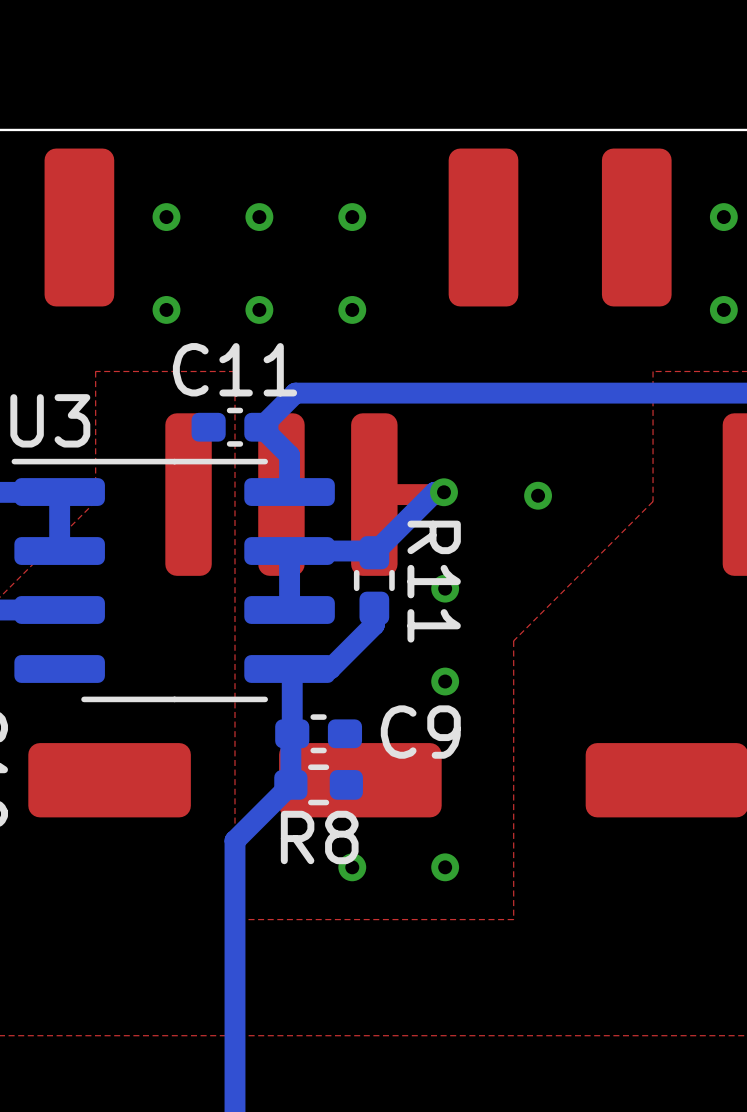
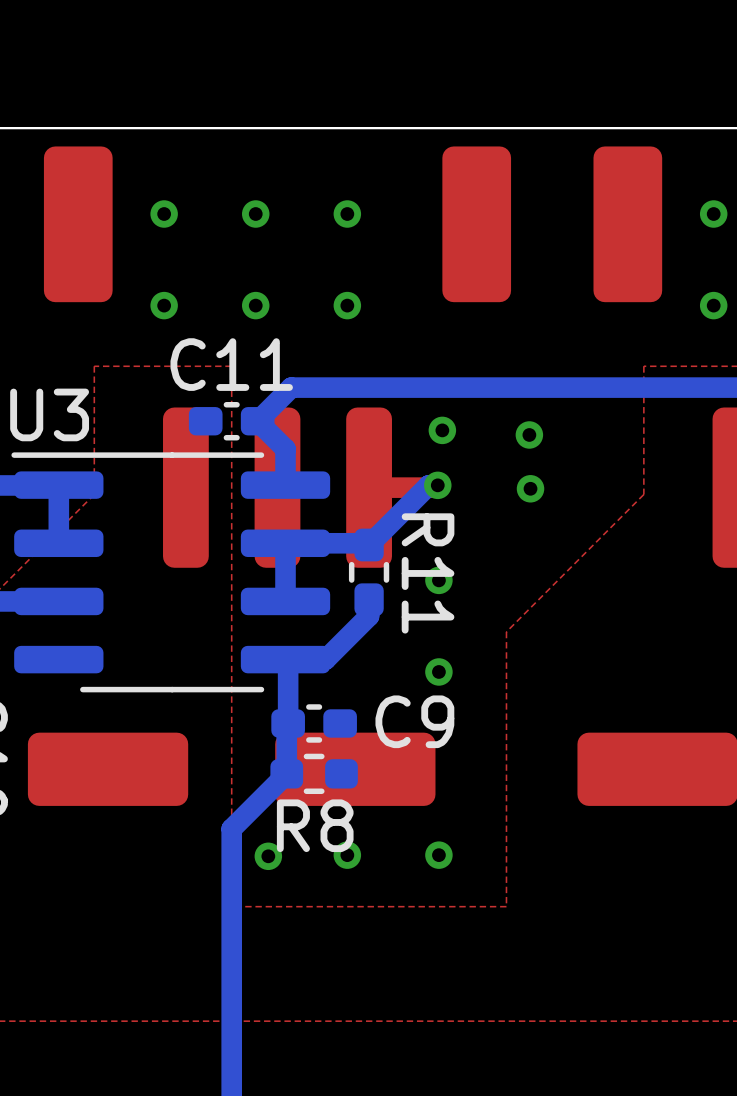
via: none -> (442, 430)
via: none -> (529, 434)
via: none -> (268, 856)

